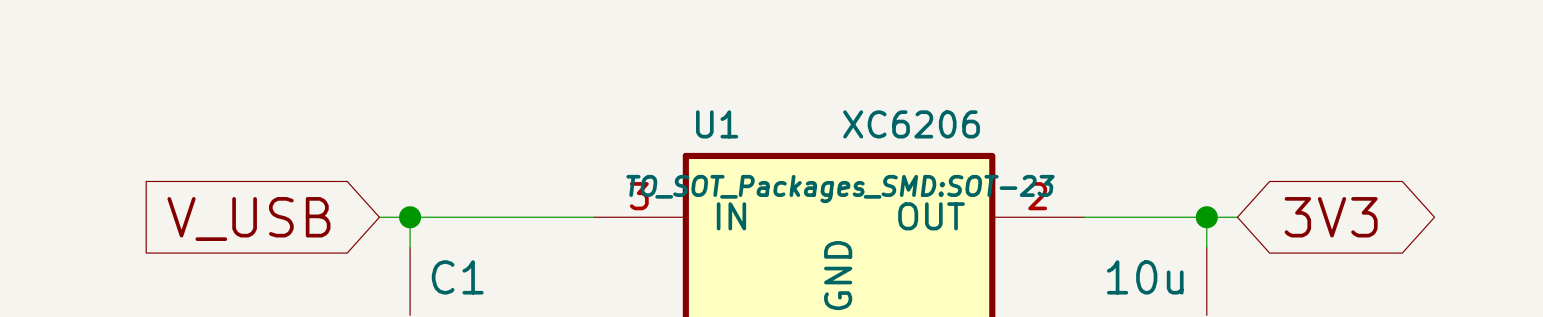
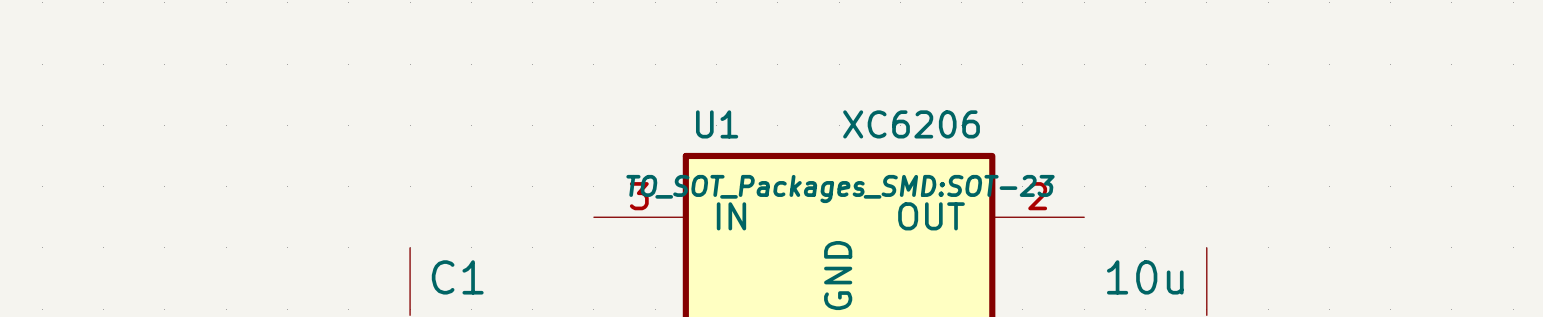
wire: (379, 217) (593, 217) -> none
wire: (410, 217) (410, 247) -> none
junction: (410, 217) -> none
wire: (1084, 217) (1237, 217) -> none
wire: (1206, 217) (1206, 247) -> none
junction: (1206, 217) -> none
global label: 3V3 (1331, 217) -> none
global label: V_USB (248, 219) -> none

